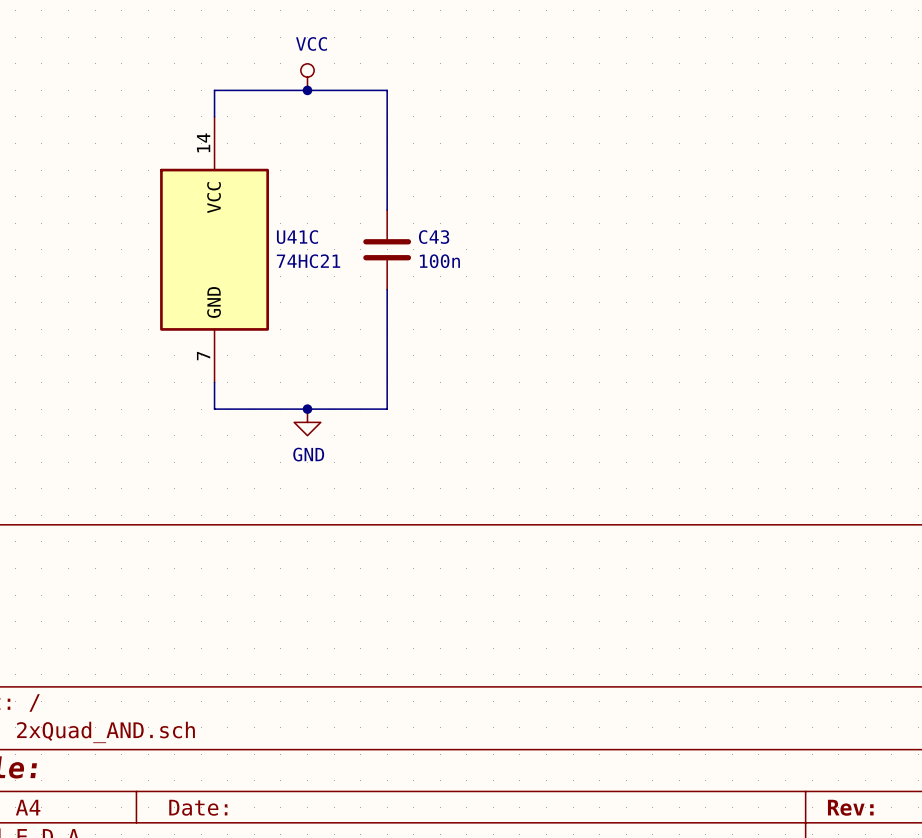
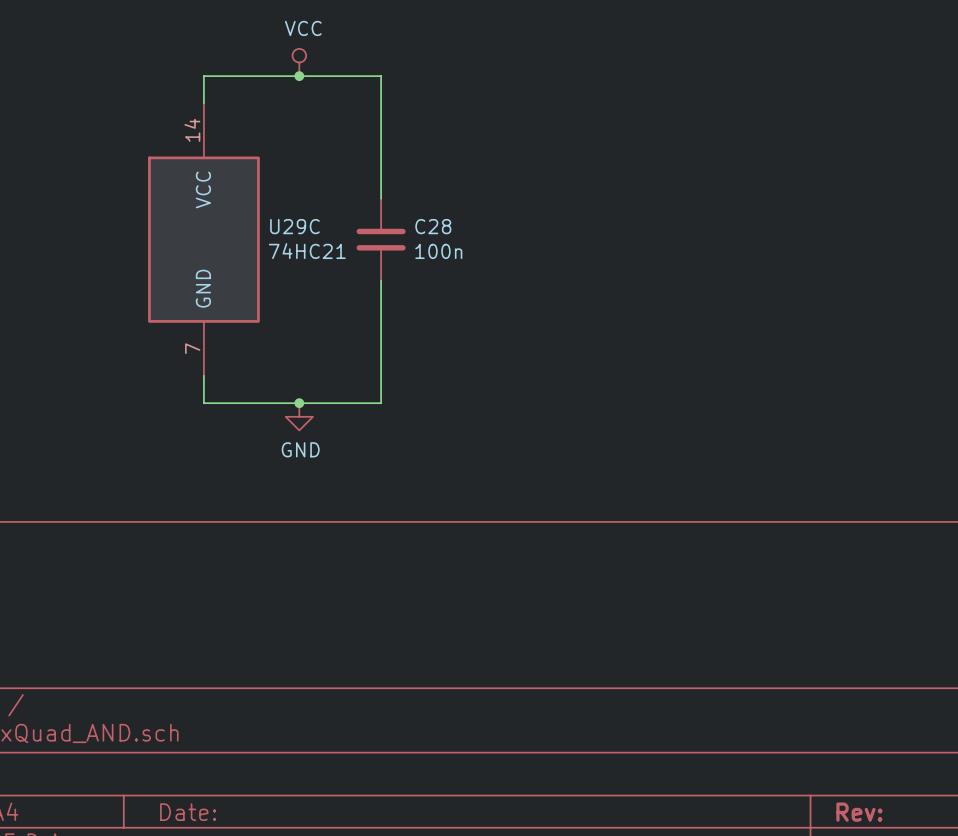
U41C name: U41C (297, 237) -> U29C (294, 226)
C43 name: C43 (434, 237) -> C28 (433, 226)

